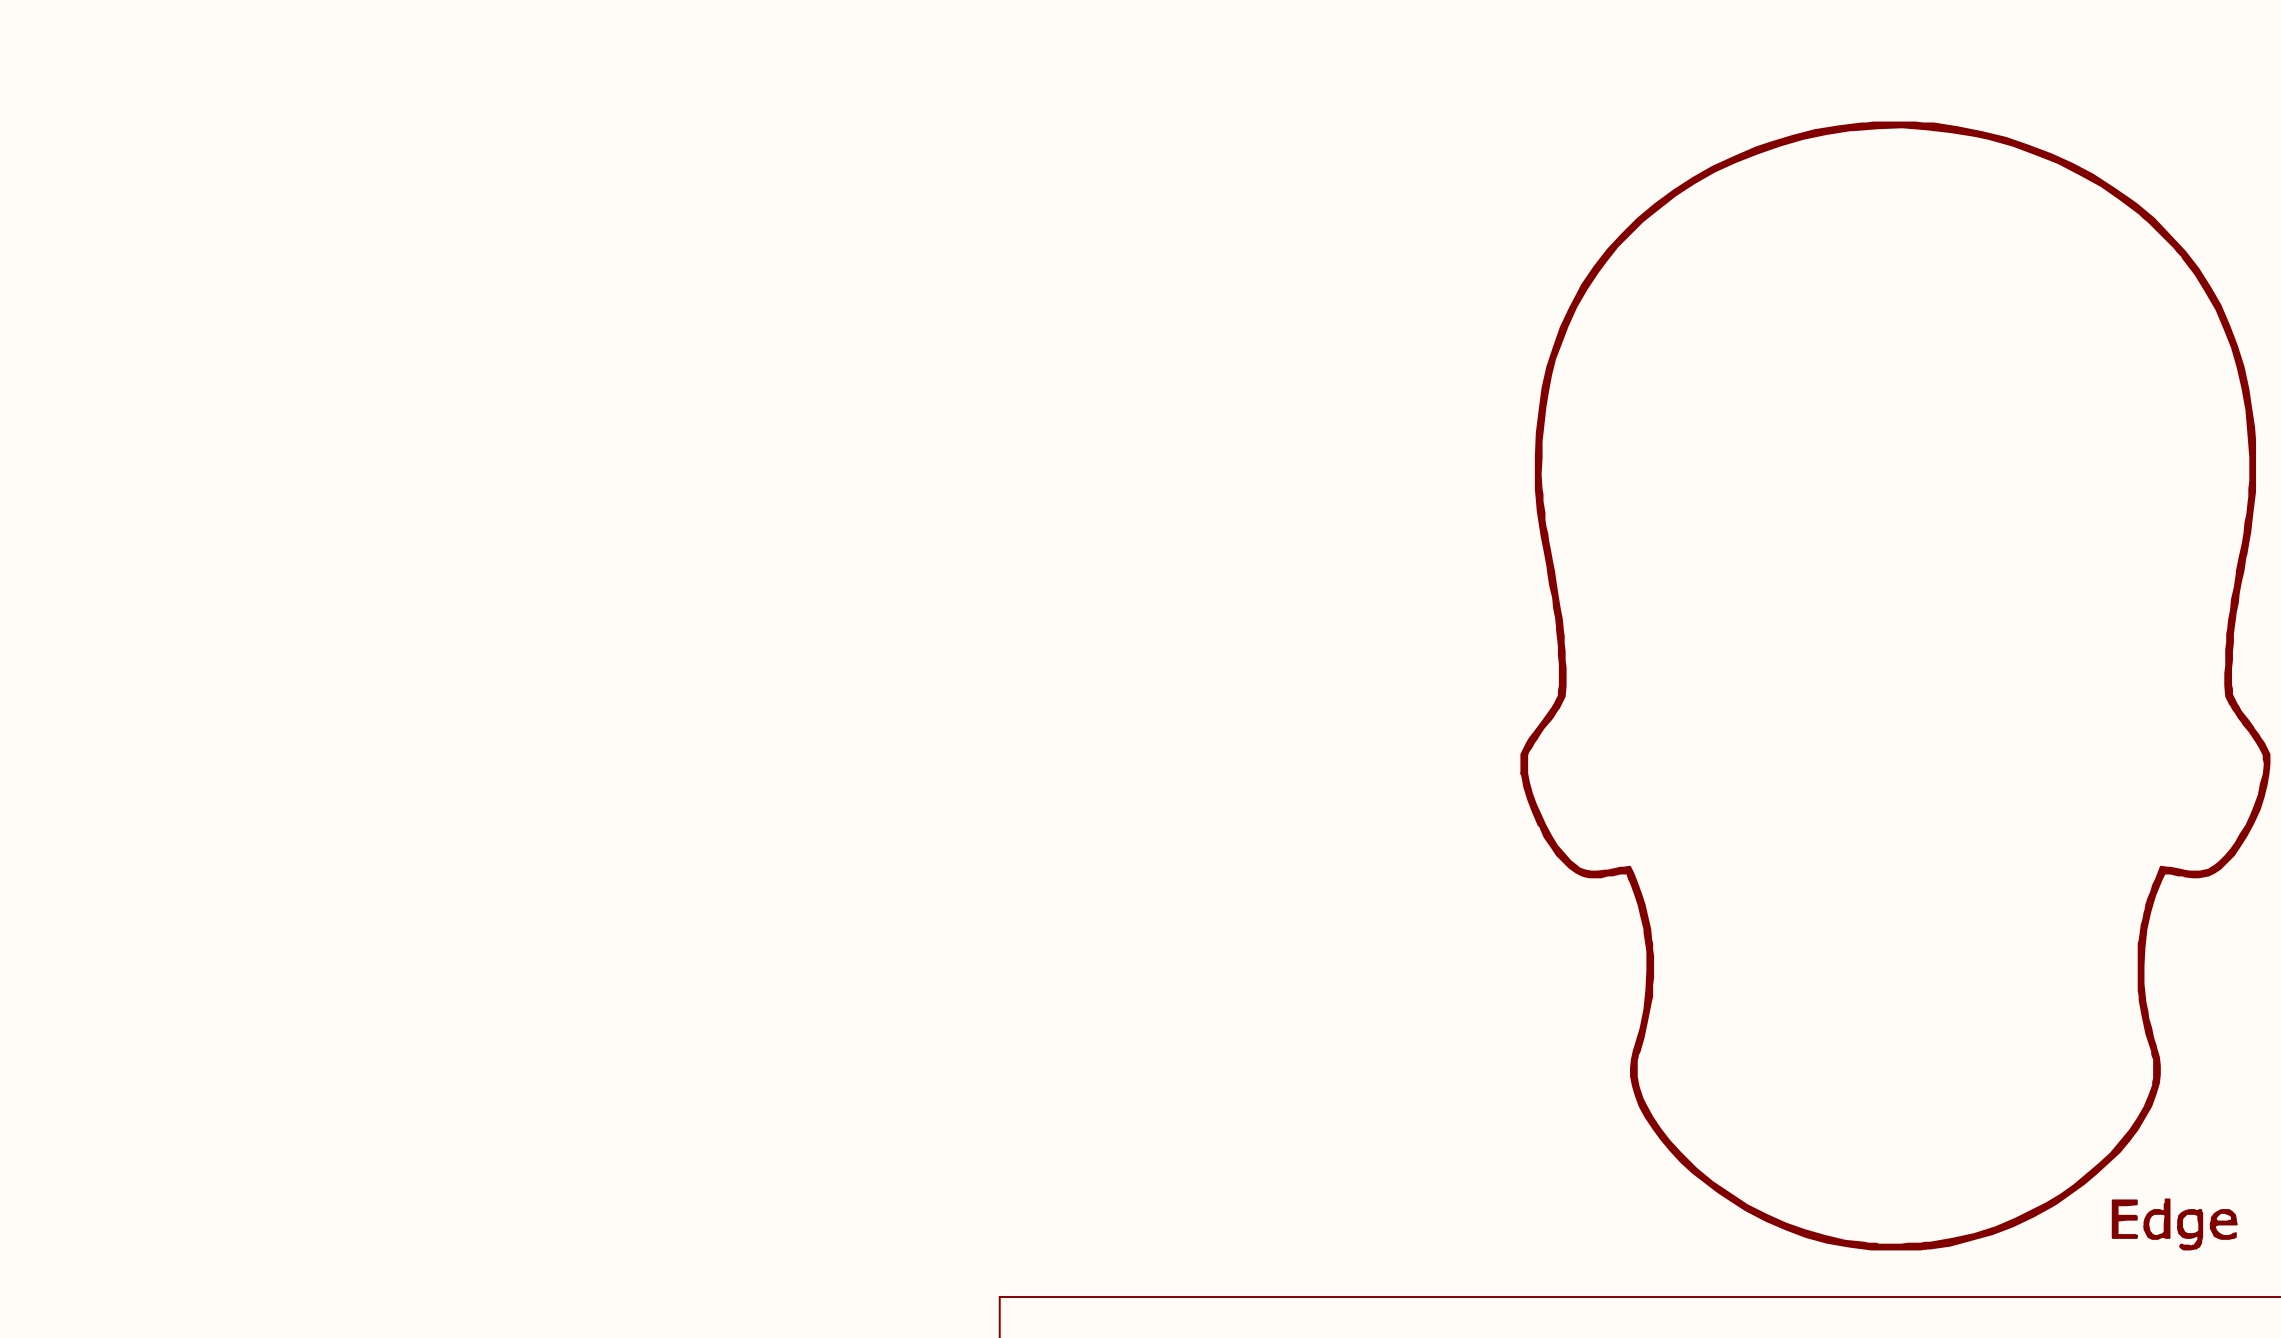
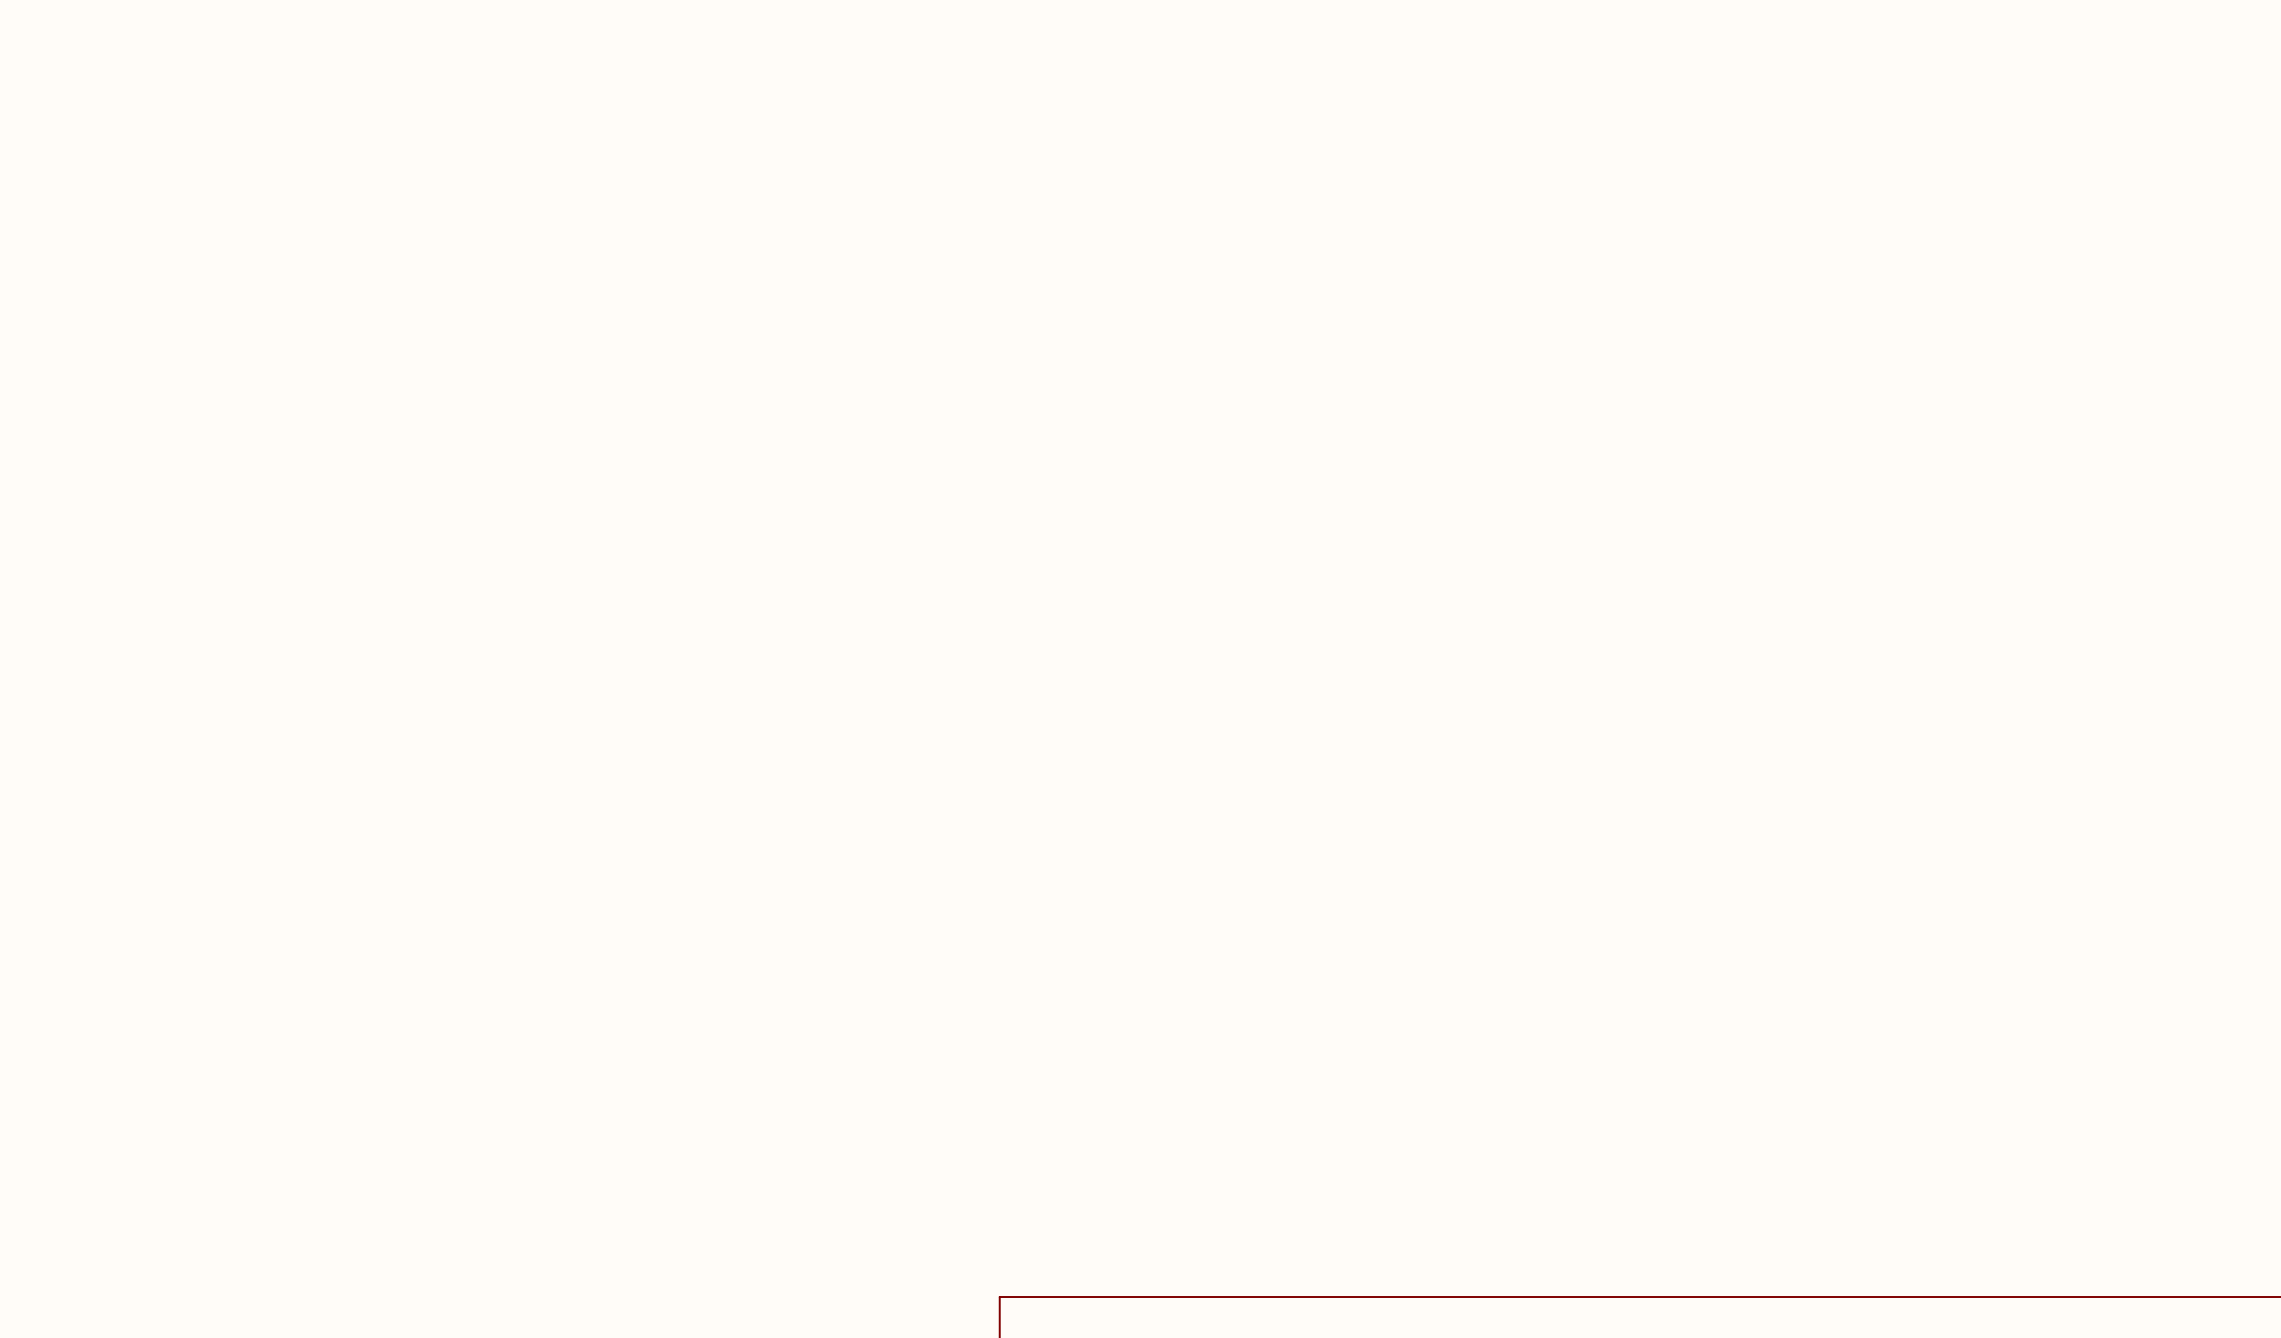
part: (1895, 685) -> none

